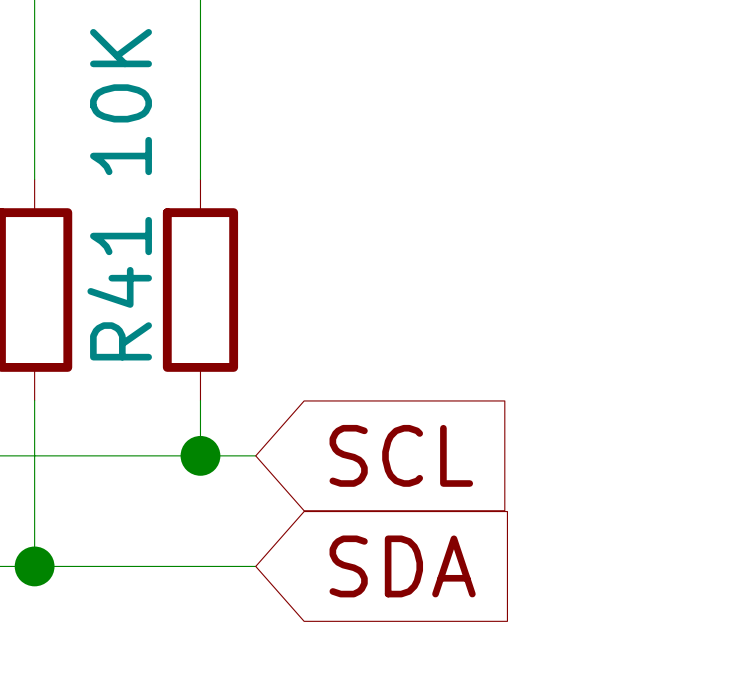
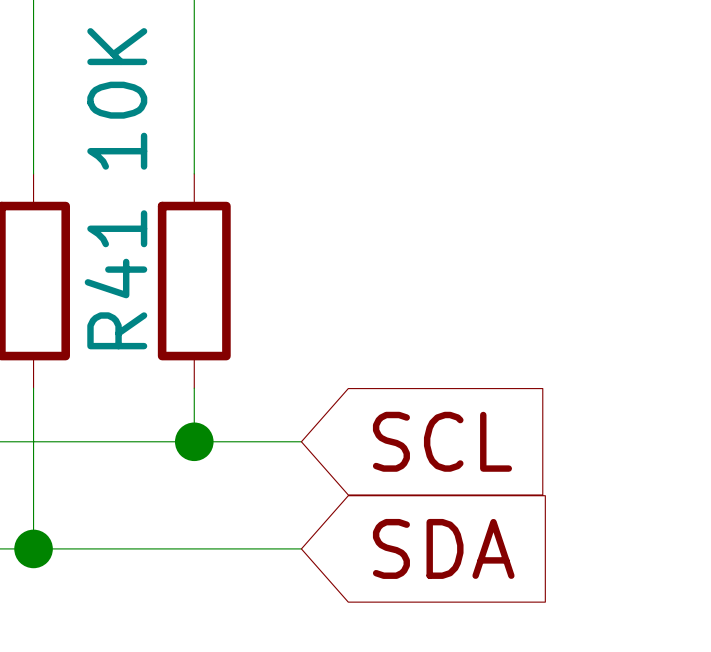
wire: none -> (247, 441) (301, 441)
global label position: SCL (401, 455) -> SCL (442, 441)
wire: none -> (247, 548) (301, 548)
global label position: SDA (402, 566) -> SDA (443, 548)

